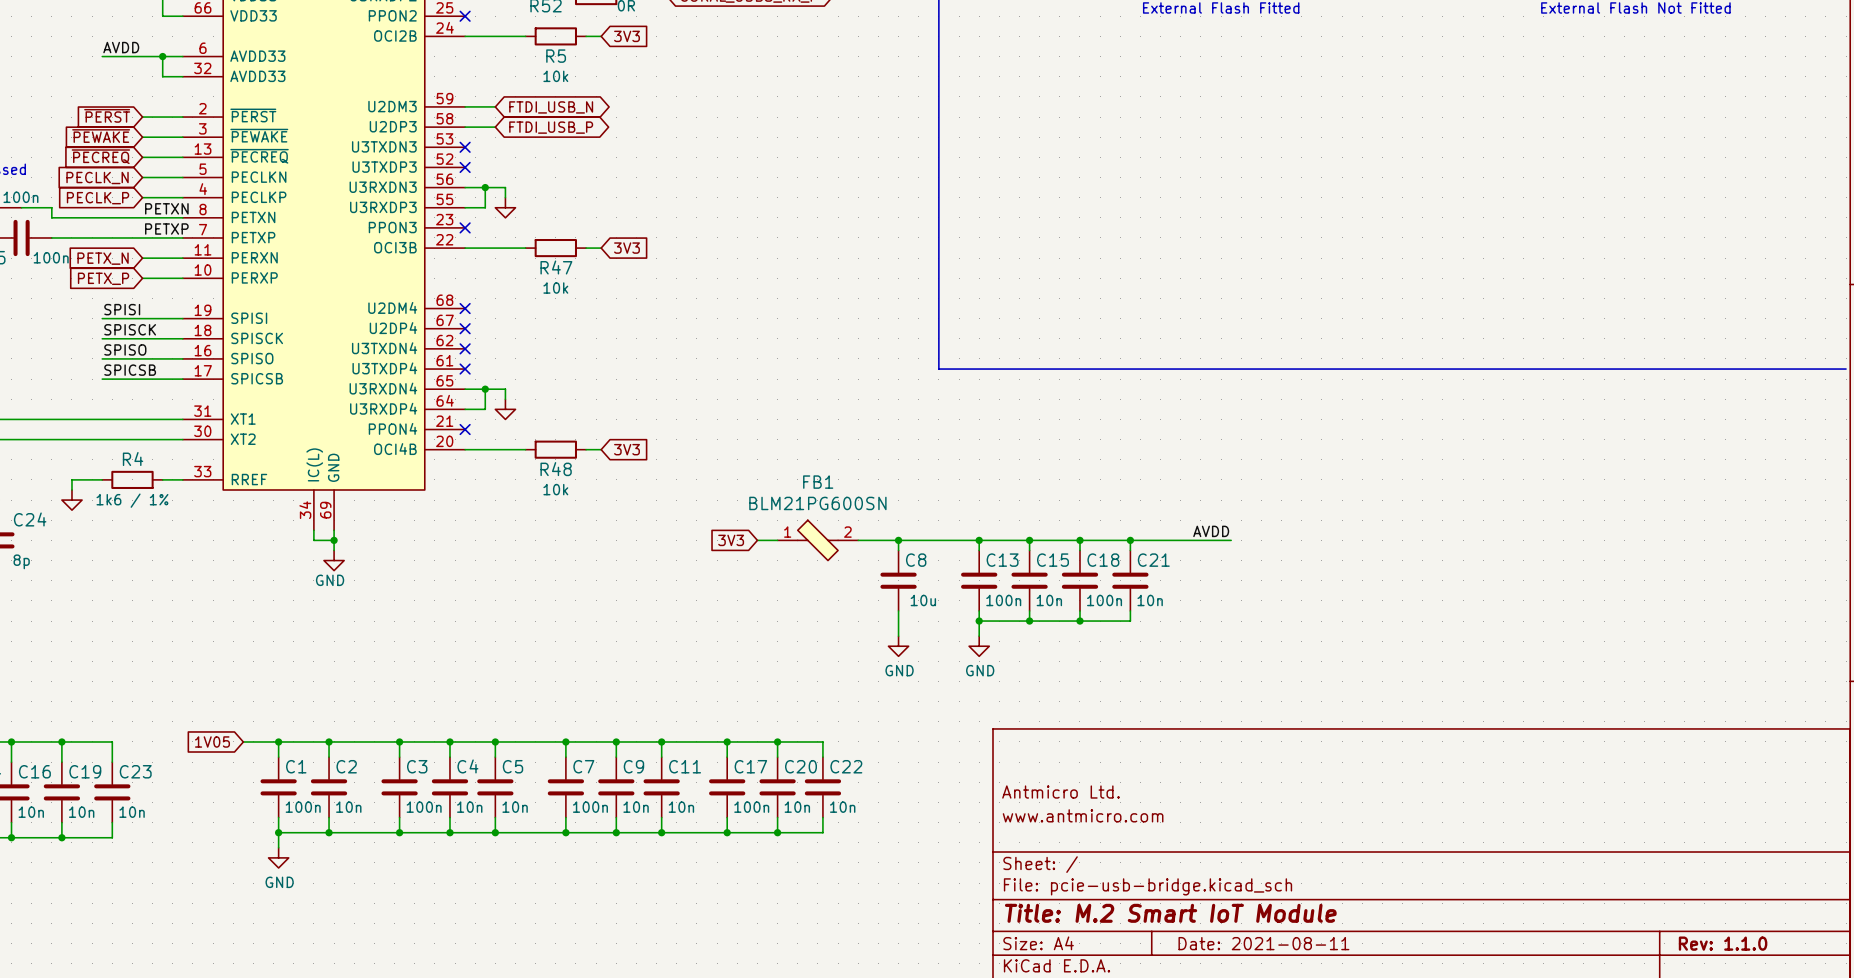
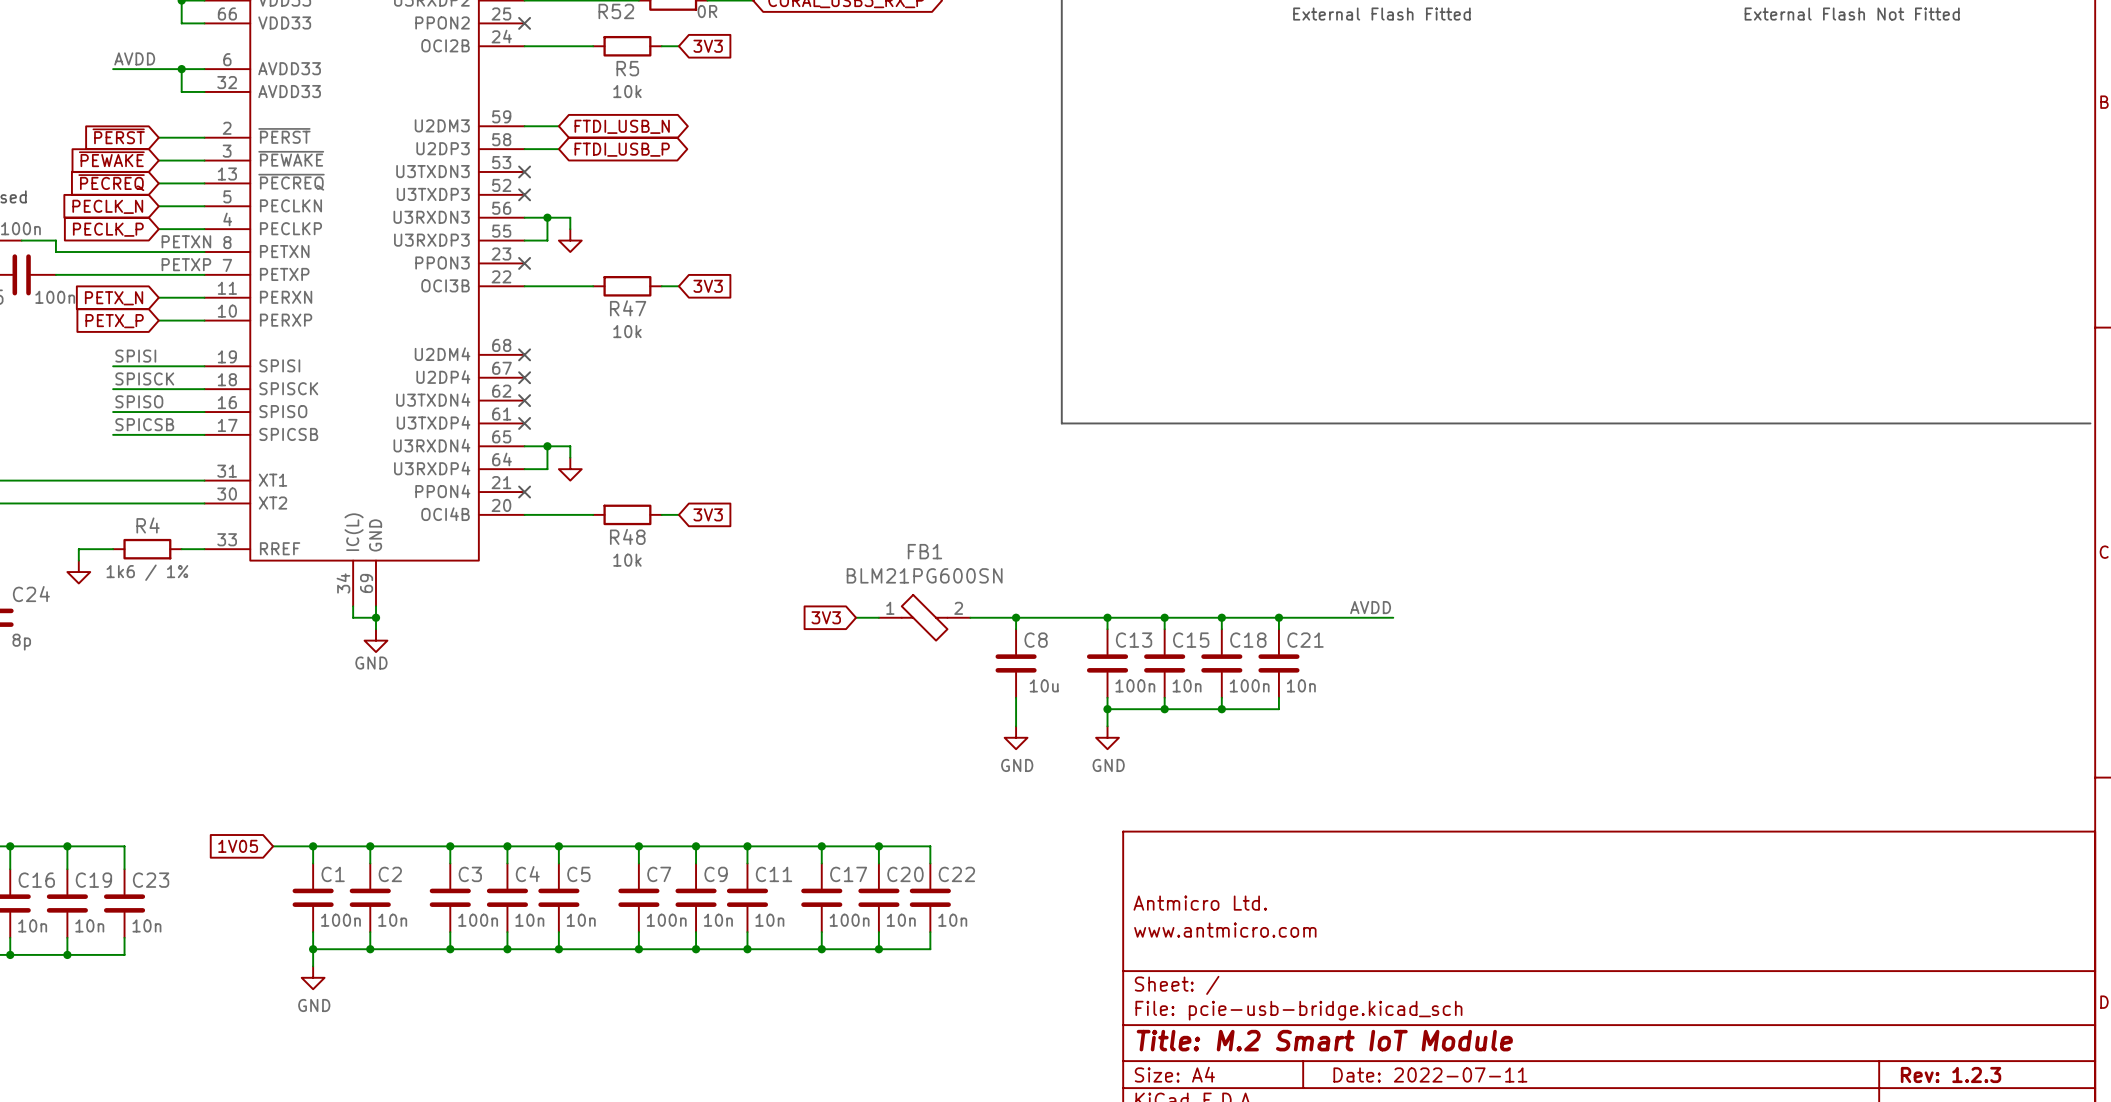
title block: Date: 2021-08-11 (1263, 943) -> Date: 2022-07-11 (1430, 1074)
title block: Rev: 1.1.0 (1723, 943) -> Rev: 1.2.3 (1951, 1074)

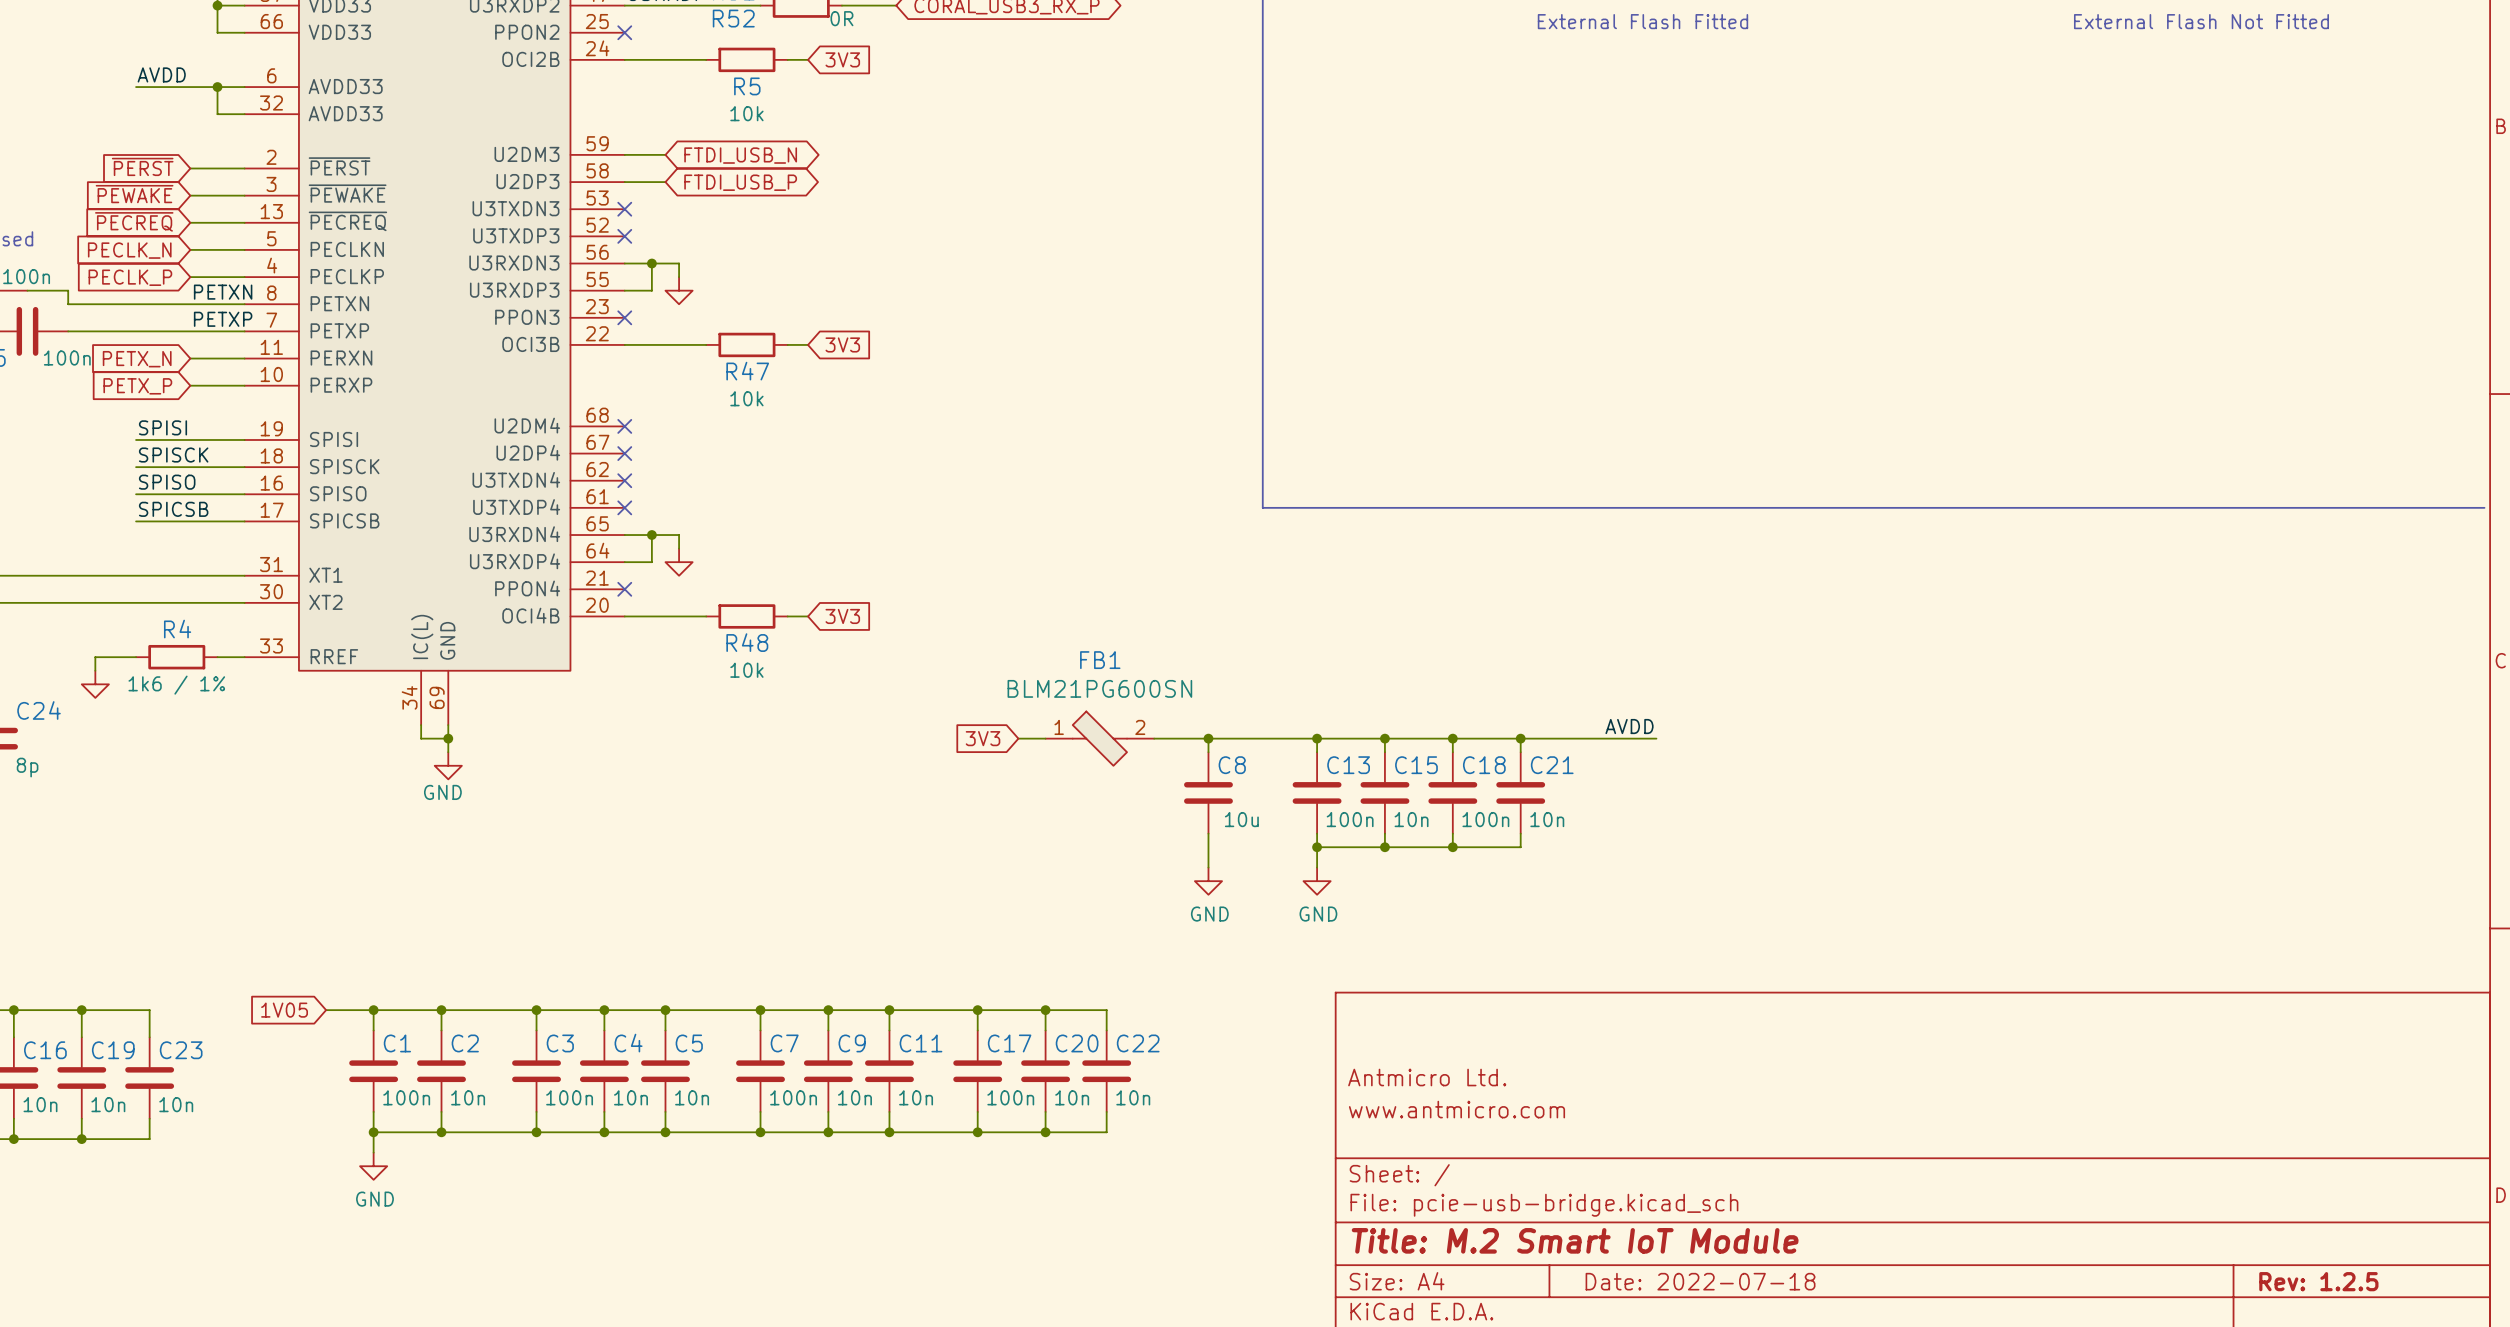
title block: Date: 2022-07-11 (1430, 1074) -> Date: 2022-07-18 (1700, 1281)
title block: Rev: 1.2.3 (1951, 1074) -> Rev: 1.2.5 (2318, 1281)

